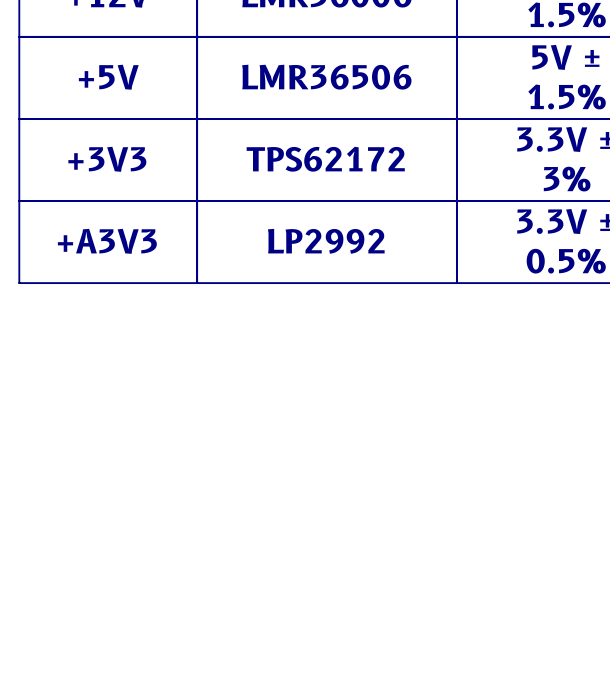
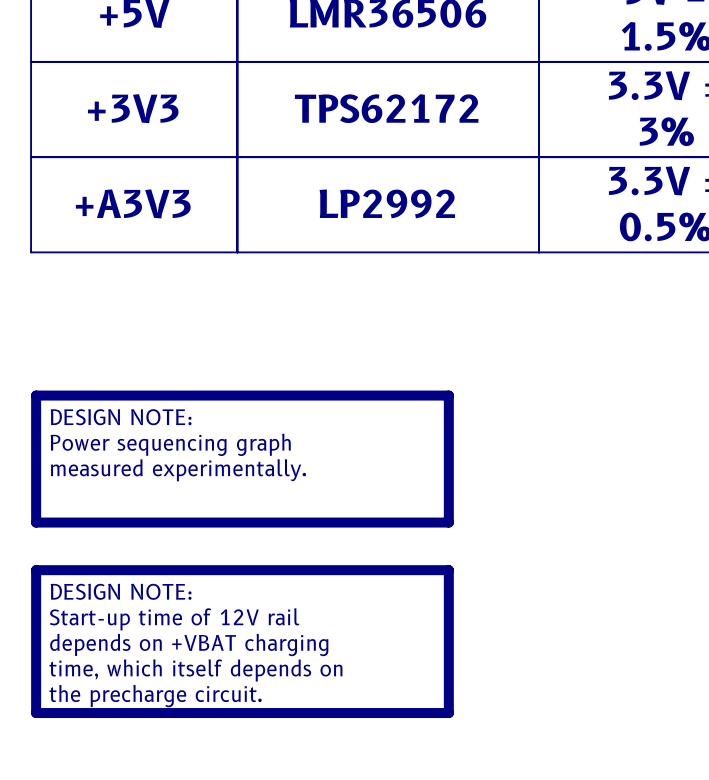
line: none -> (36, 395) (448, 395) (448, 522) (36, 522) (36, 395)
text: none -> DESIGN NOTE: (121, 417)
text: none -> Power sequencing graph (170, 444)
text: none -> measured experimentally. (178, 470)
line: none -> (36, 570) (36, 713) (448, 713) (448, 570) (36, 570)
text: none -> DESIGN NOTE: (121, 591)
text: none -> Start-up time of 12V rail (174, 619)
text: none -> depends on +VBAT charging (189, 645)
text: none -> time, which itself depends on (195, 670)
text: none -> the precharge circuit. (155, 696)

